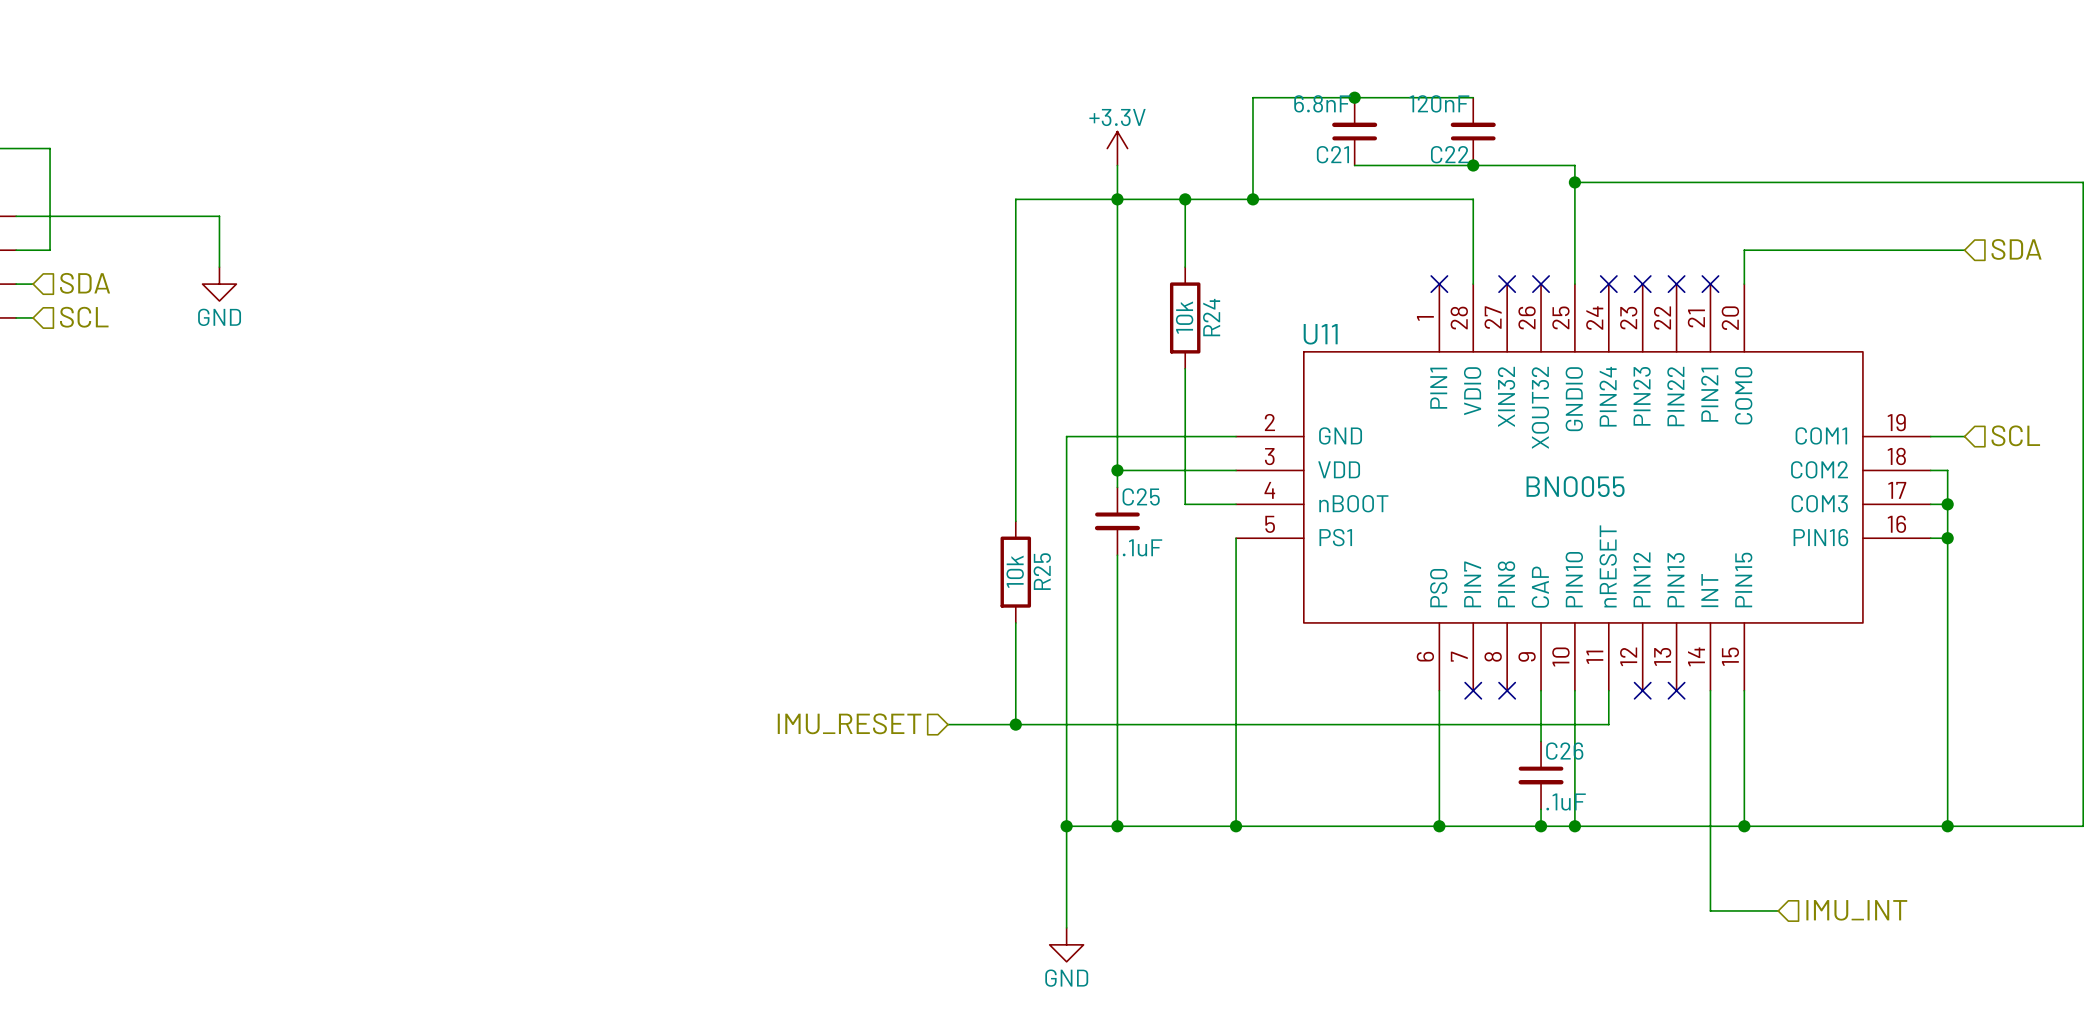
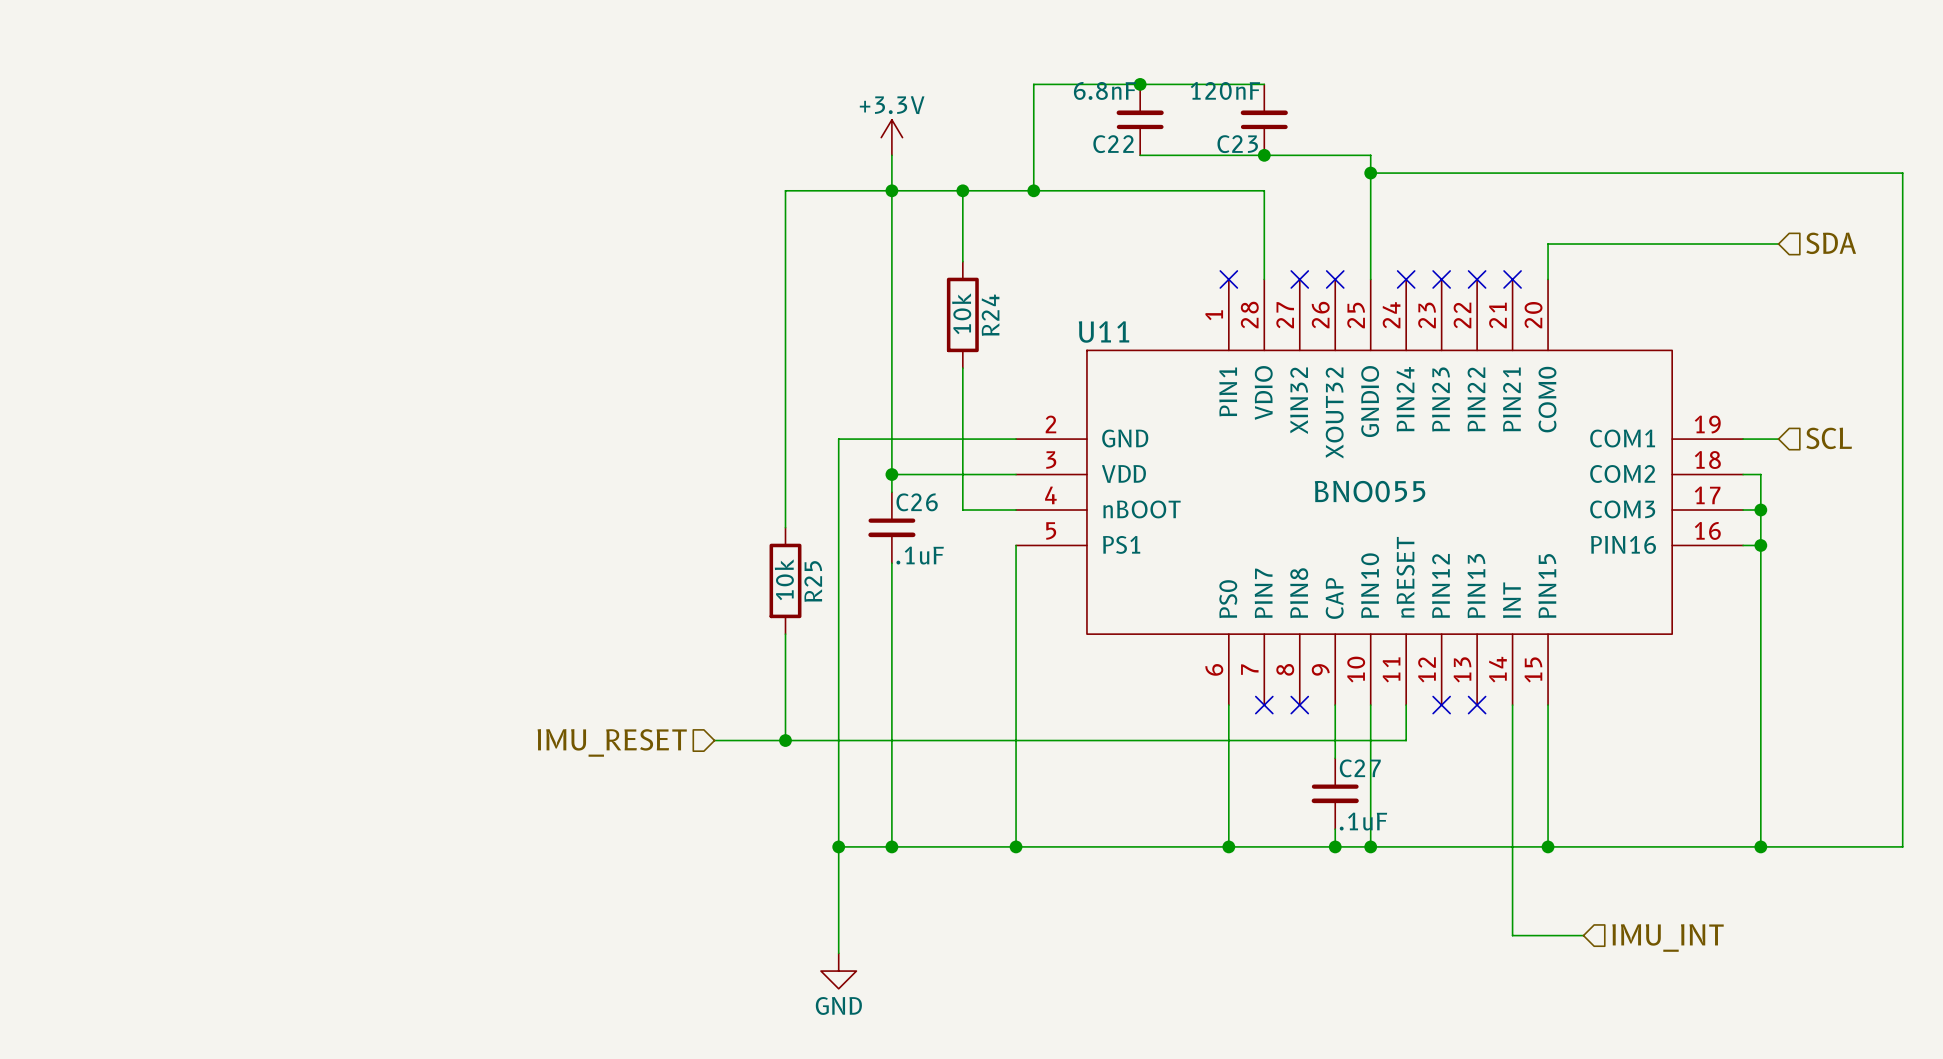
C21 name: C21 (1332, 154) -> C22 (1113, 144)
C22 name: C22 (1449, 154) -> C23 (1237, 144)
C25 name: C25 (1141, 496) -> C26 (917, 502)
C26 name: C26 (1564, 751) -> C27 (1360, 768)

